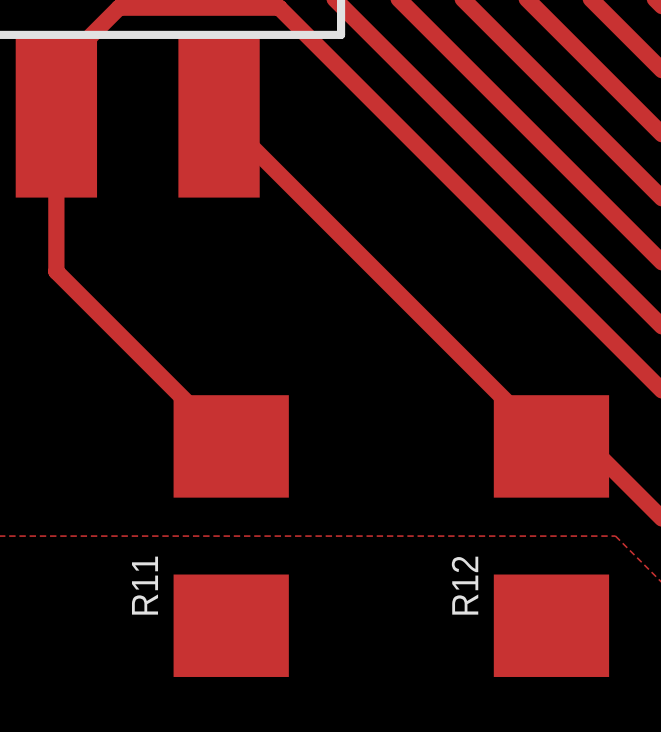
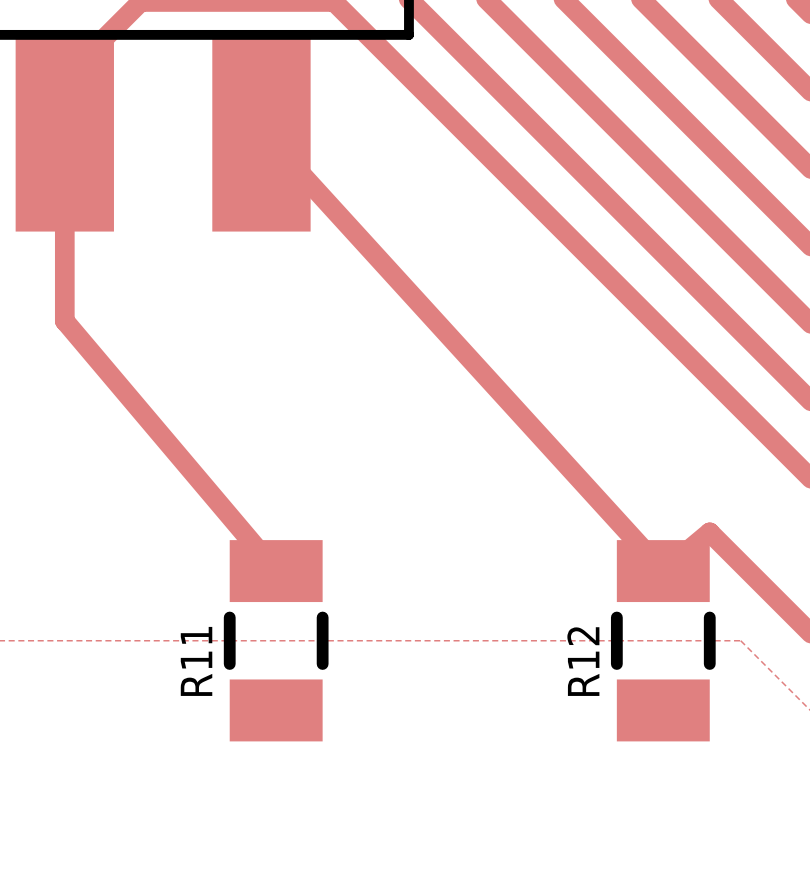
track: (221, 116) (551, 446) (589, 446) -> (264, 133) (663, 571) (709, 532)
track: (56, 271) (231, 446) -> (64, 320) (276, 571)
R11 footprint: [173, 395, 289, 677] -> [223, 540, 329, 742]
R12 footprint: [493, 395, 610, 677] -> [610, 540, 716, 742]

